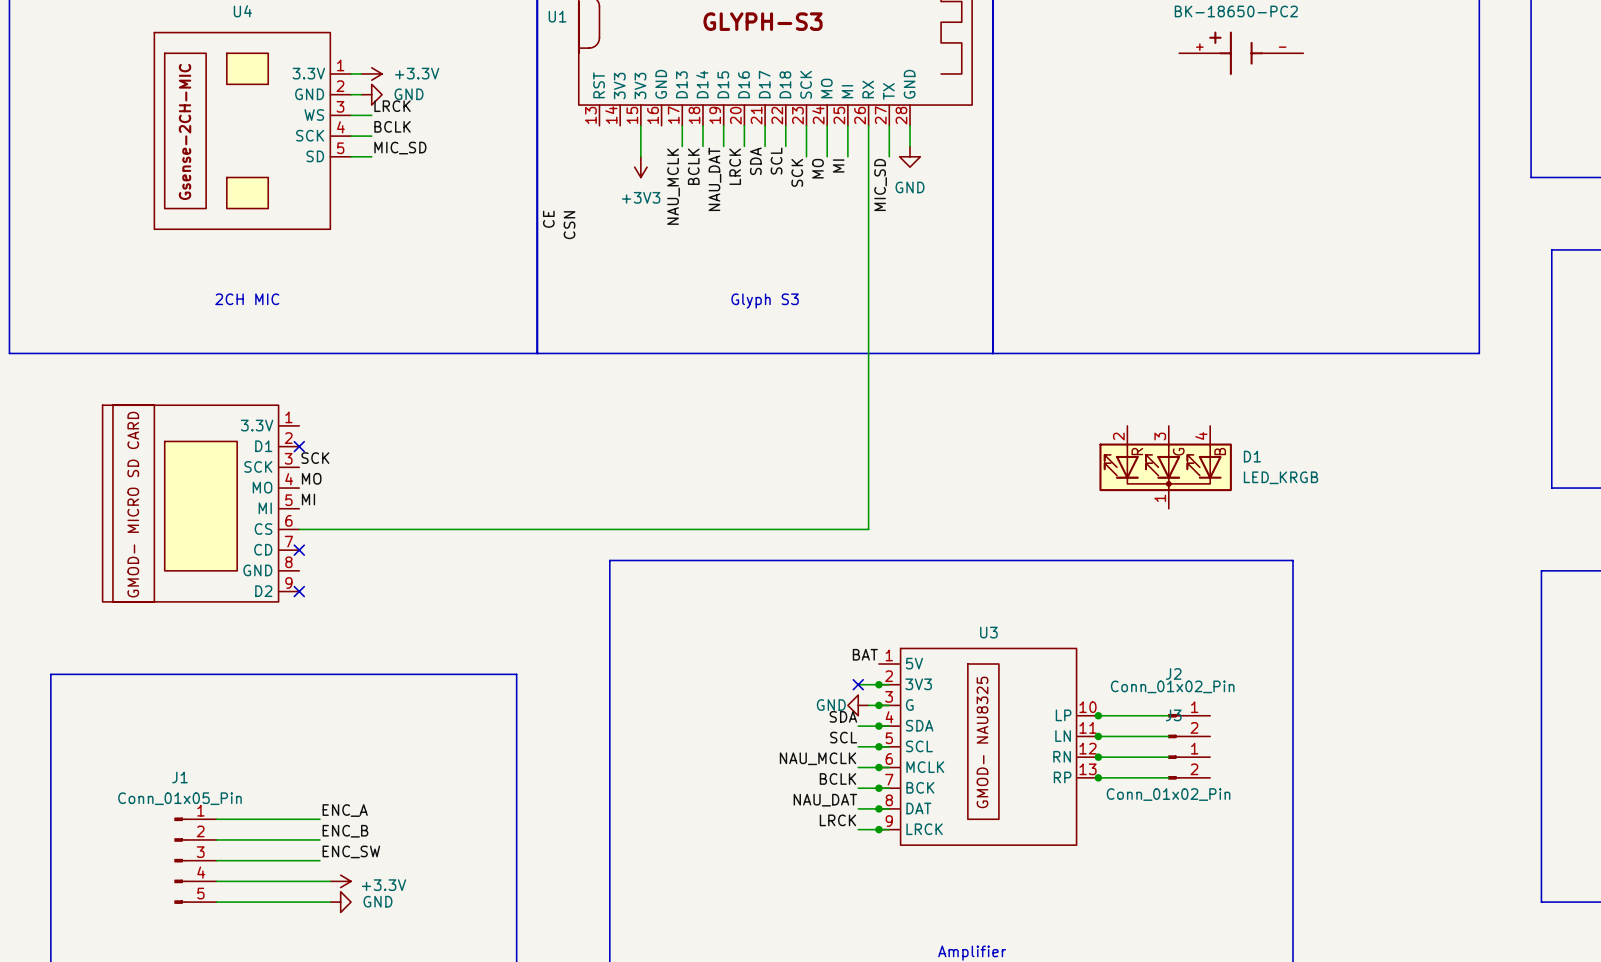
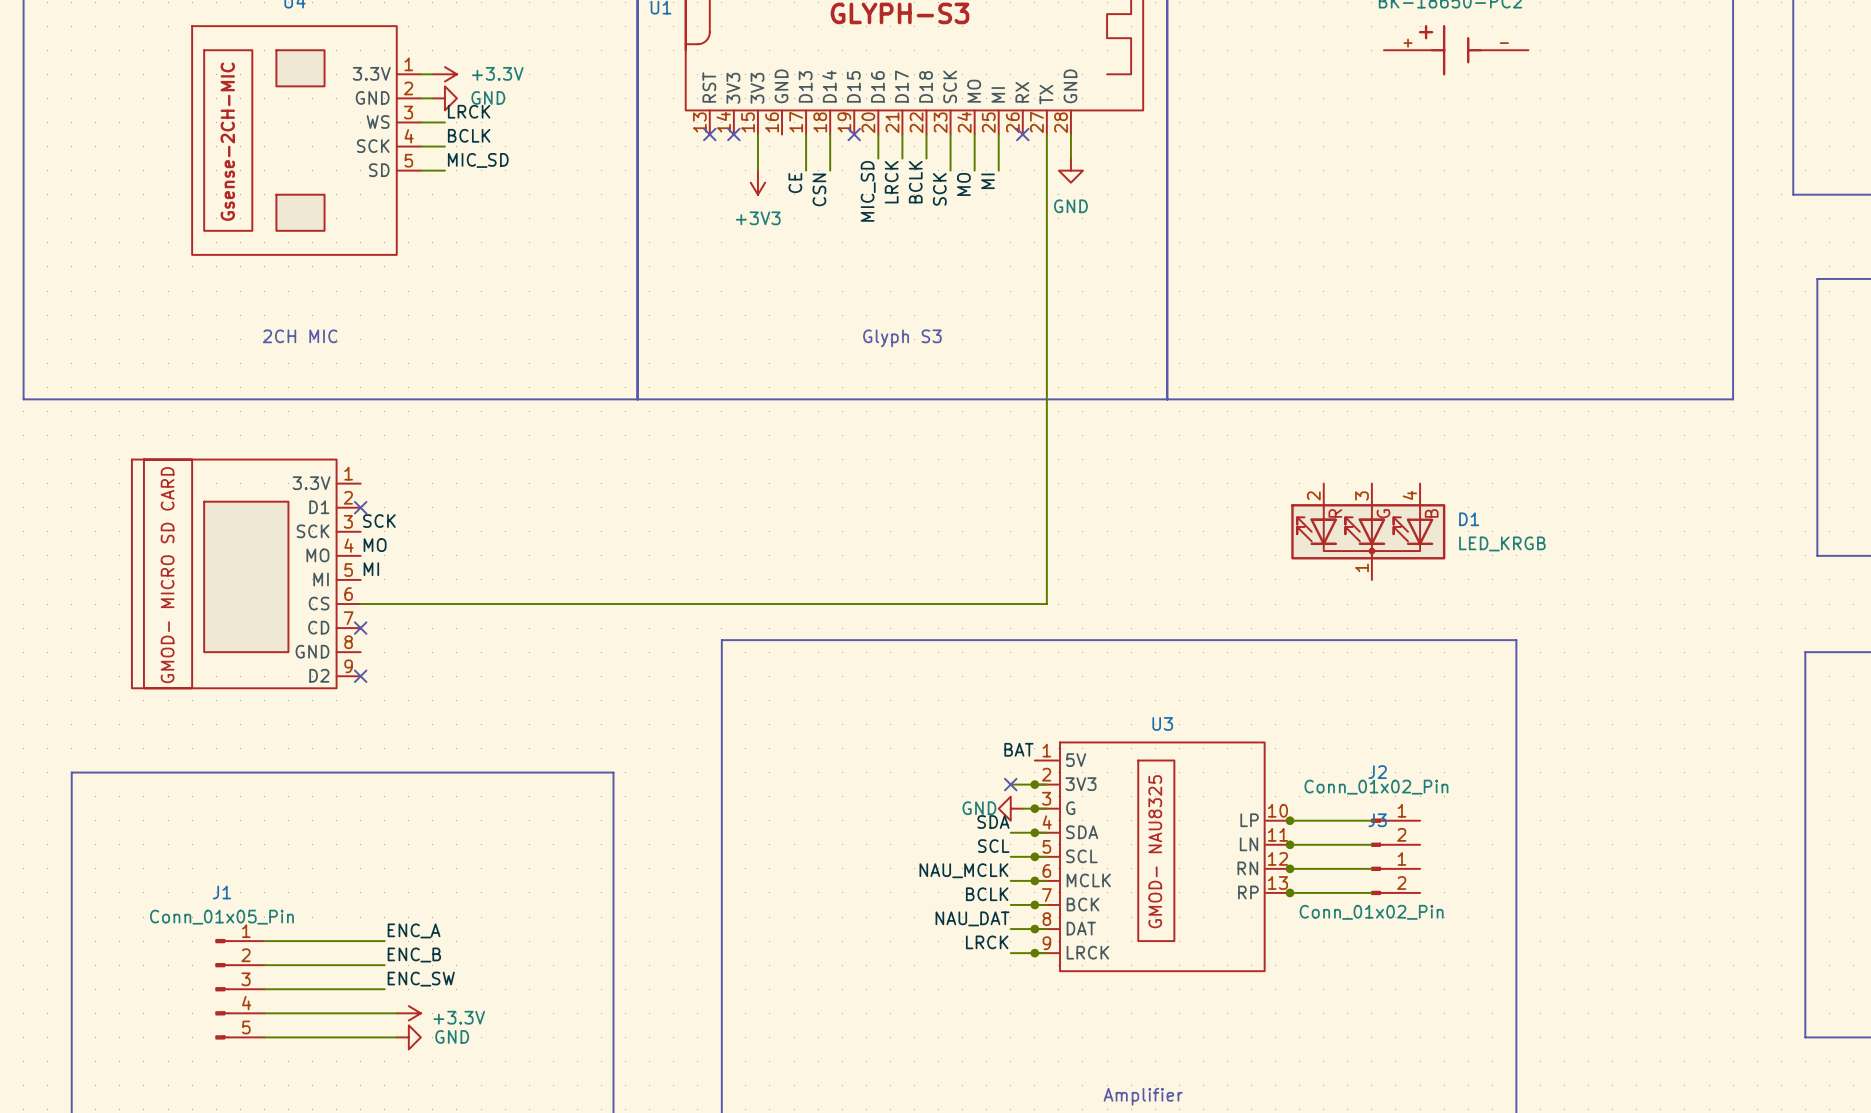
no-connect mark: none -> (709, 134)
no-connect mark: none -> (733, 134)
wire: (723, 125) (723, 146) -> none
no-connect mark: none -> (854, 134)
wire: (868, 125) (868, 529) -> (1046, 170) (1046, 604) (1022, 604)
no-connect mark: none -> (1022, 134)
wire: none -> (806, 158) (806, 170)
wire: none -> (830, 158) (830, 170)
label: SDA (755, 161) -> LRCK (891, 182)
label: SCL (776, 161) -> BCLK (915, 182)
label: BCLK (693, 166) -> none
label: LRCK (735, 166) -> MIC_SD (868, 191)
label: NAU_DAT (714, 179) -> none
label: MIC_SD (880, 184) -> none
label: NAU_MCLK (673, 186) -> none
label position: CE (548, 219) -> CE (795, 183)
label position: CSN (569, 225) -> CSN (819, 189)

